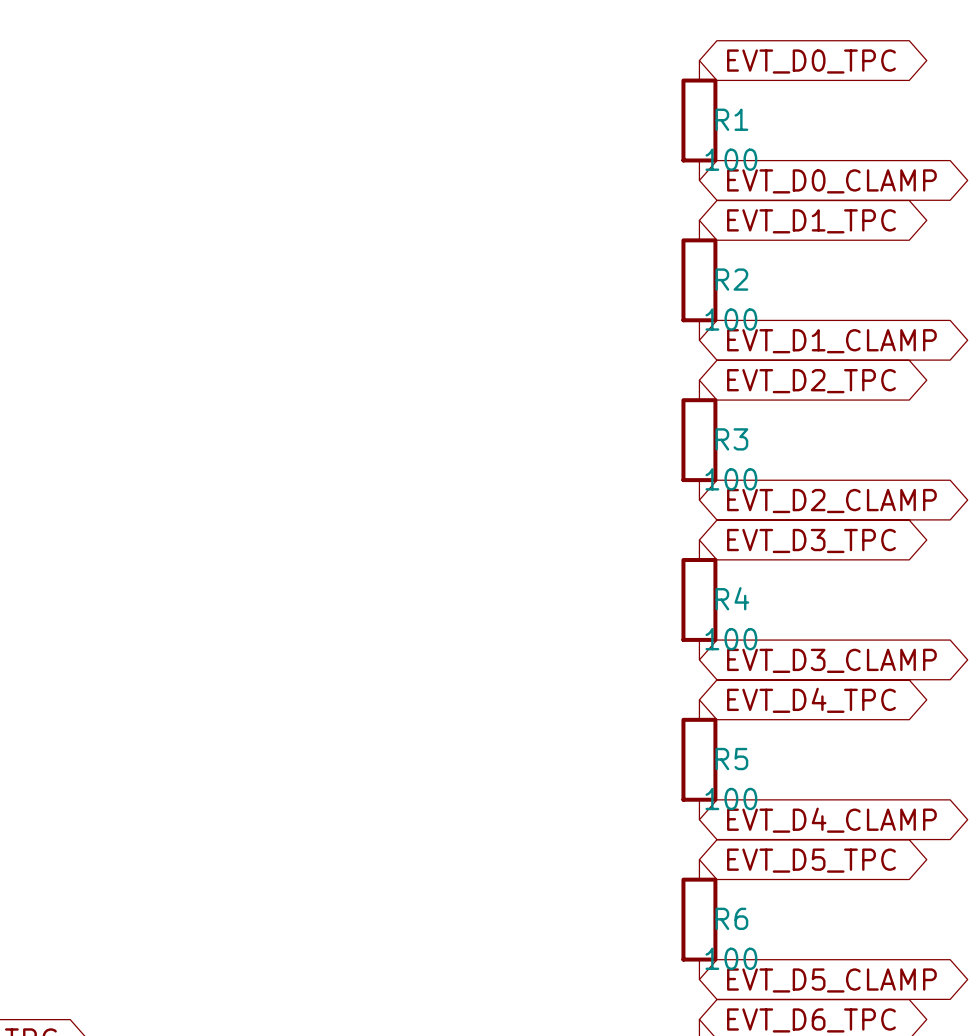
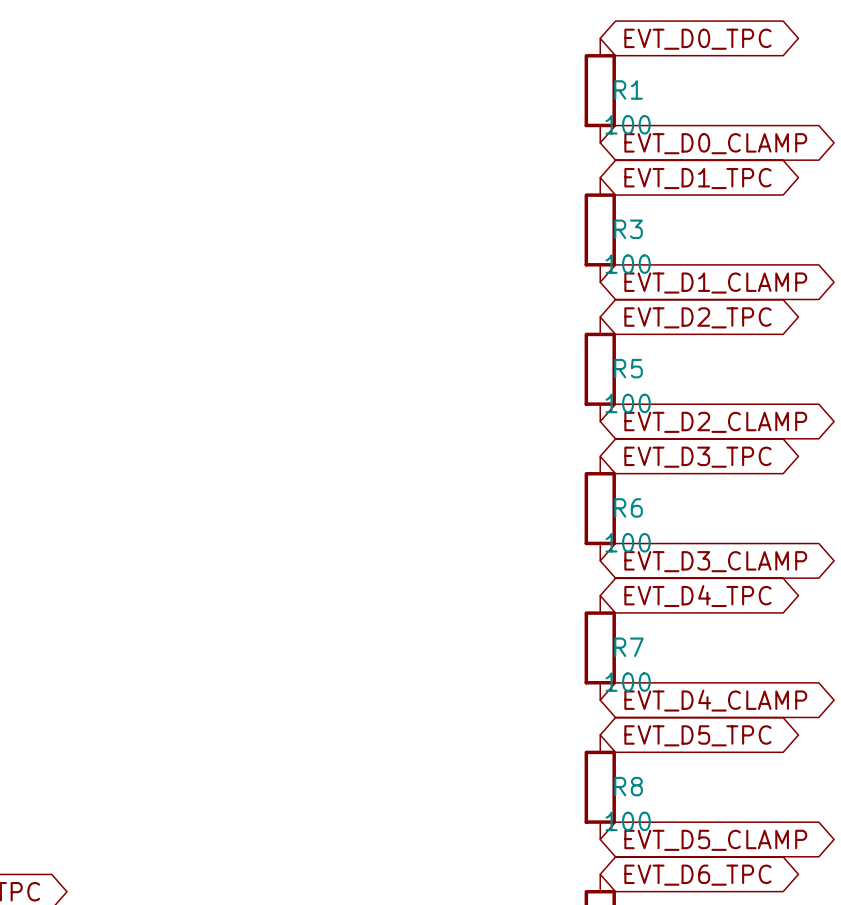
R2 name: R2 (731, 279) -> R3 (628, 229)
R3 name: R3 (731, 439) -> R5 (628, 368)
R4 name: R4 (732, 598) -> R6 (628, 507)
R5 name: R5 (731, 759) -> R7 (628, 647)
R6 name: R6 (731, 918) -> R8 (628, 786)

